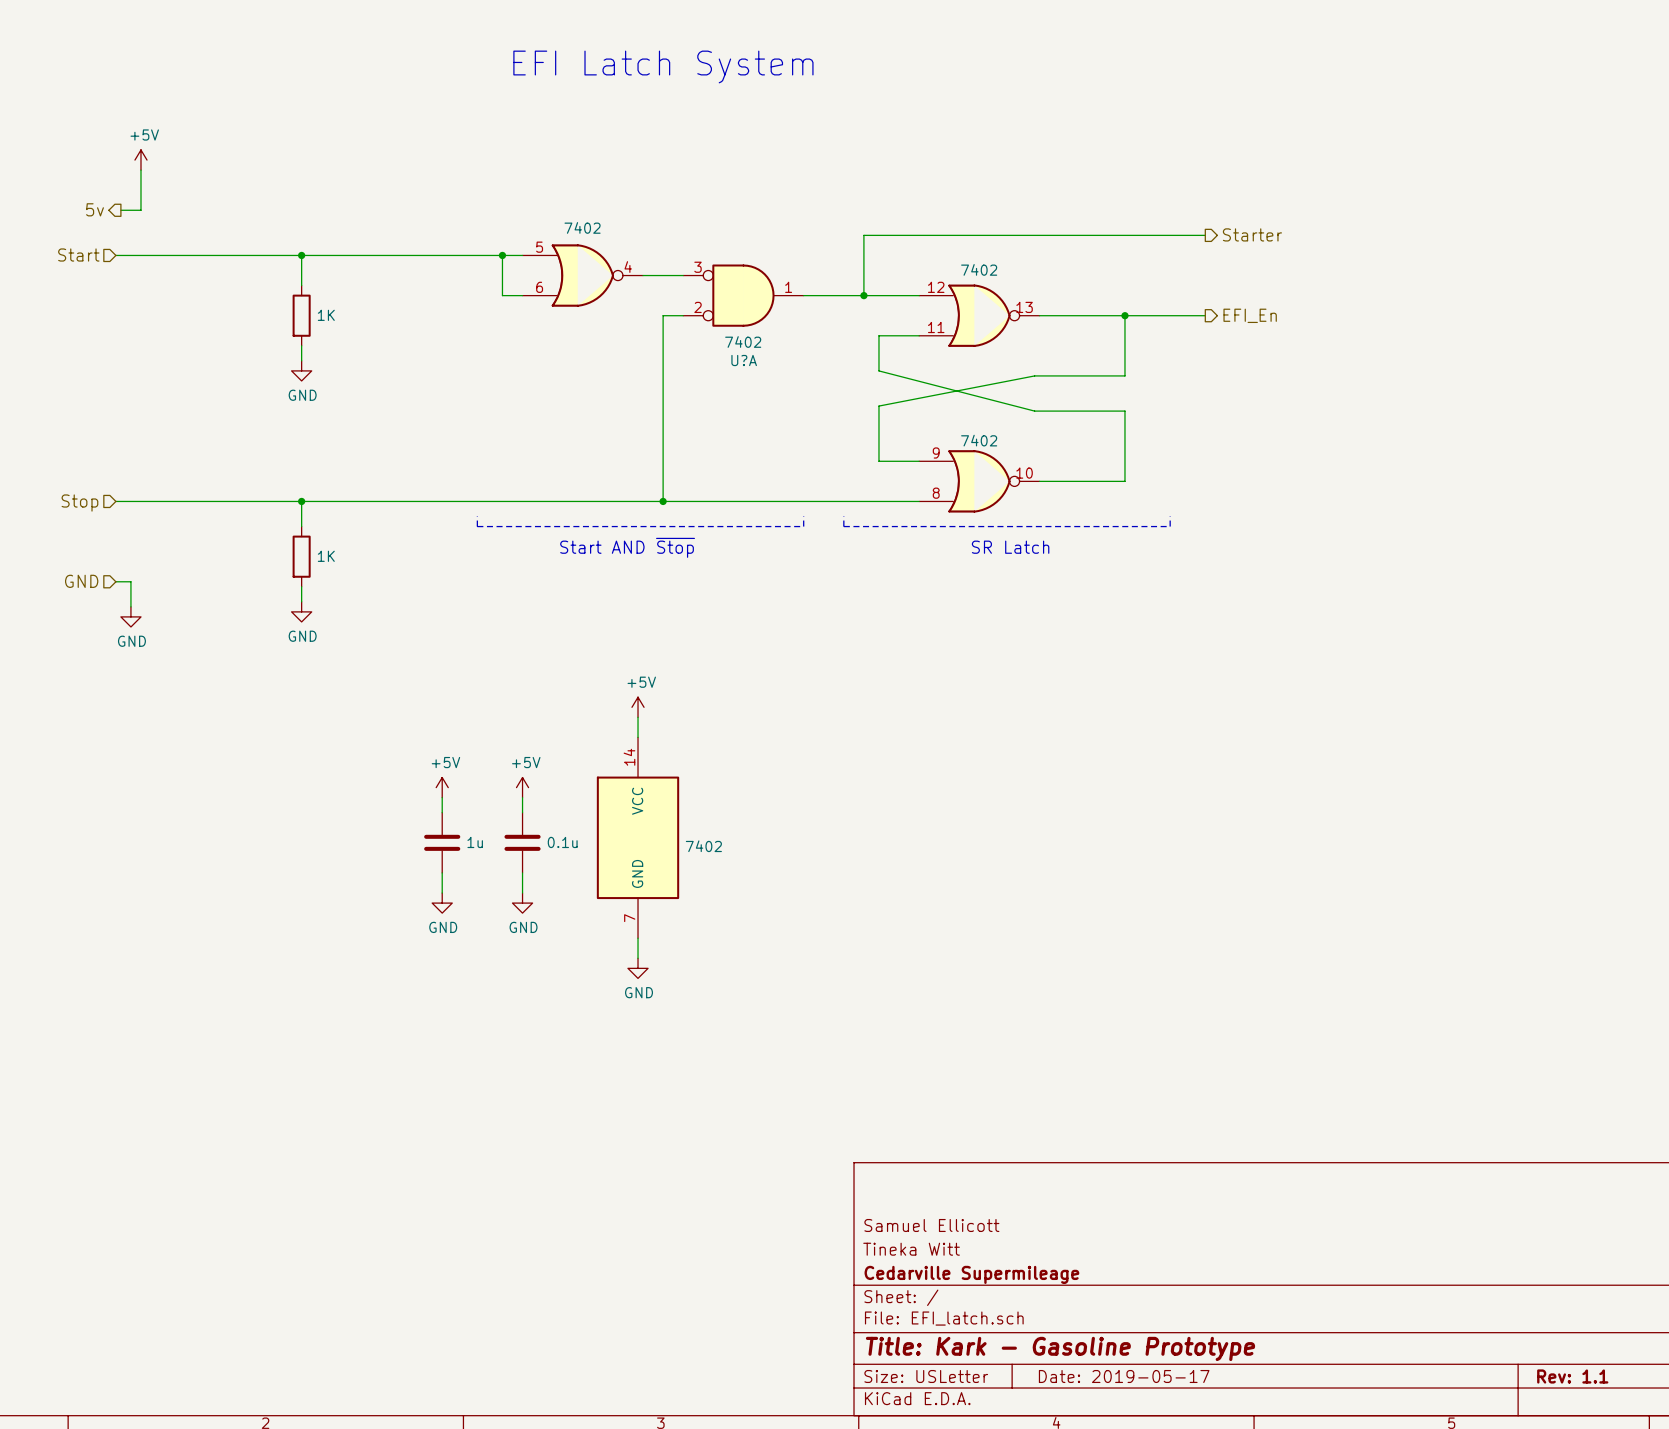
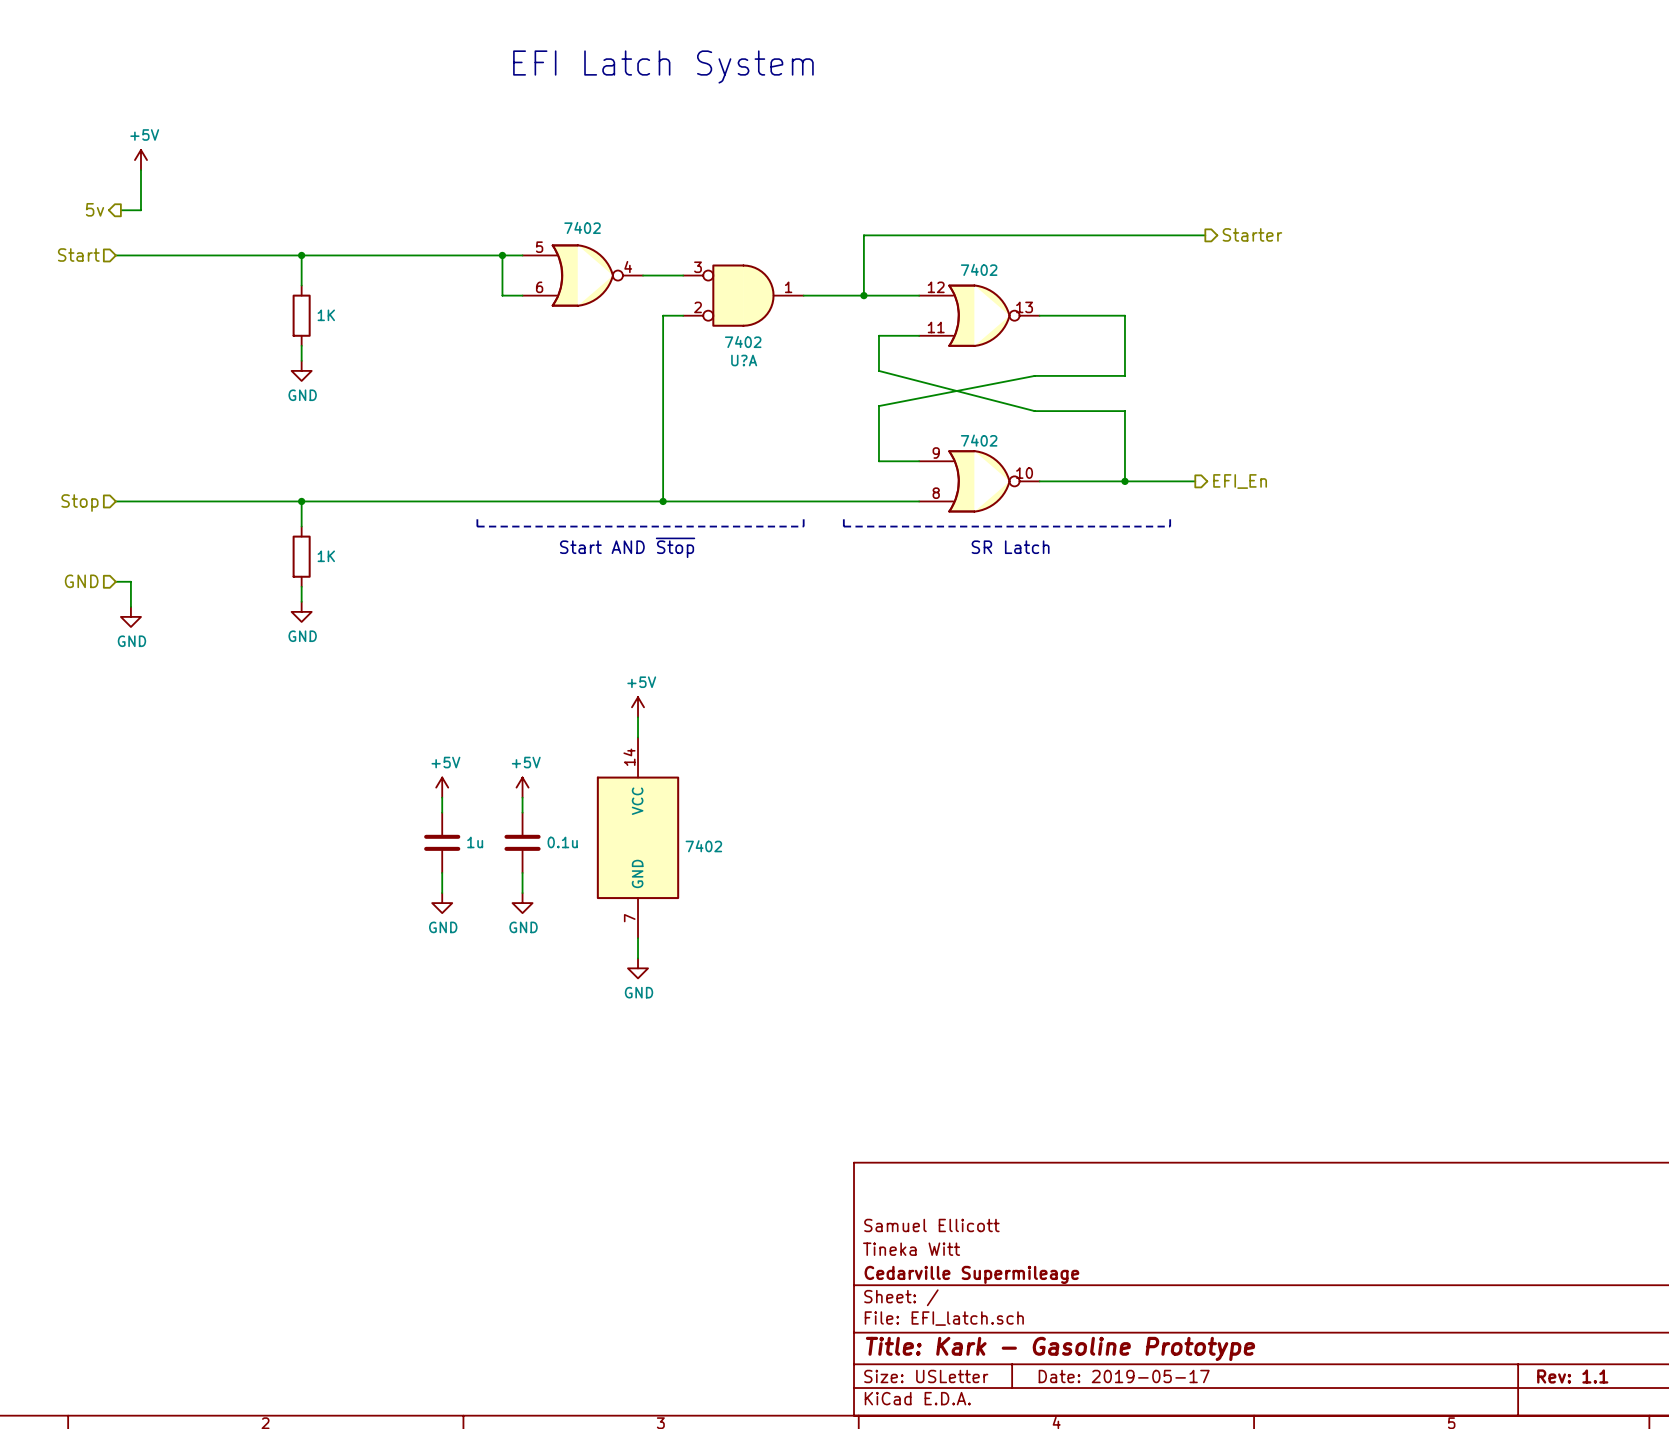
wire: (1124, 315) (1205, 315) -> none
junction: (1124, 315) -> none
hierarchical label position: EFI_En (1250, 315) -> EFI_En (1240, 481)
wire: none -> (1124, 481) (1195, 481)
junction: none -> (1124, 481)

